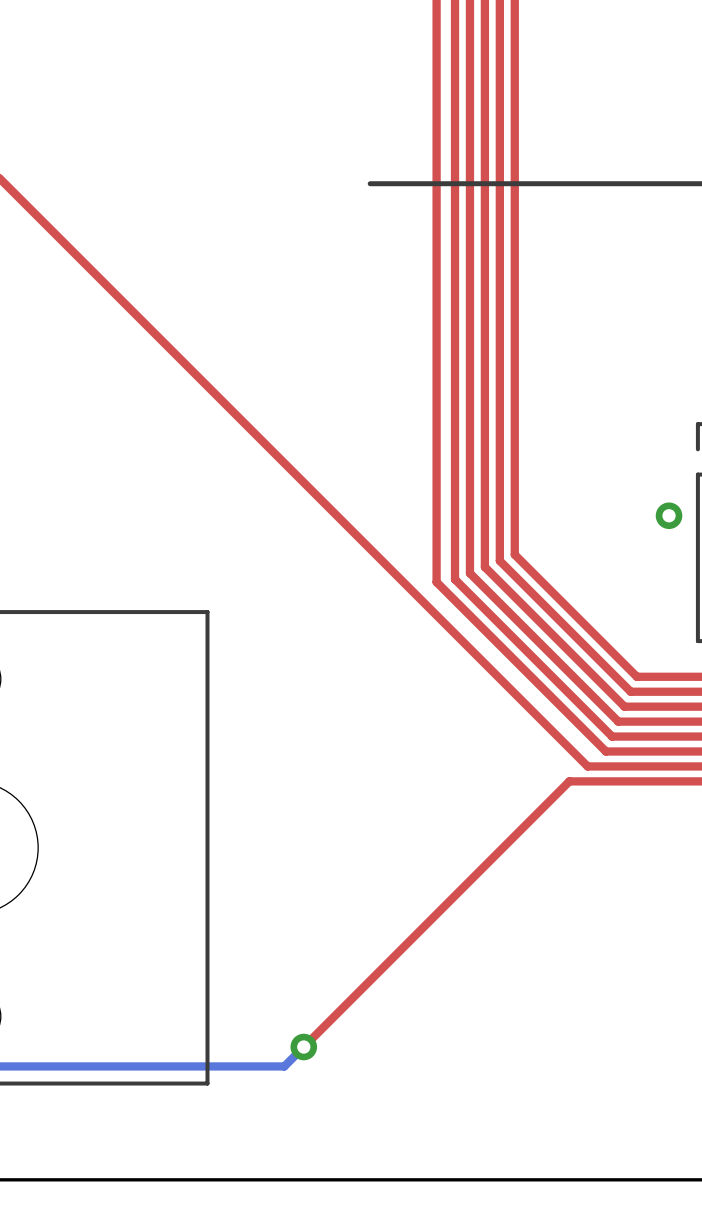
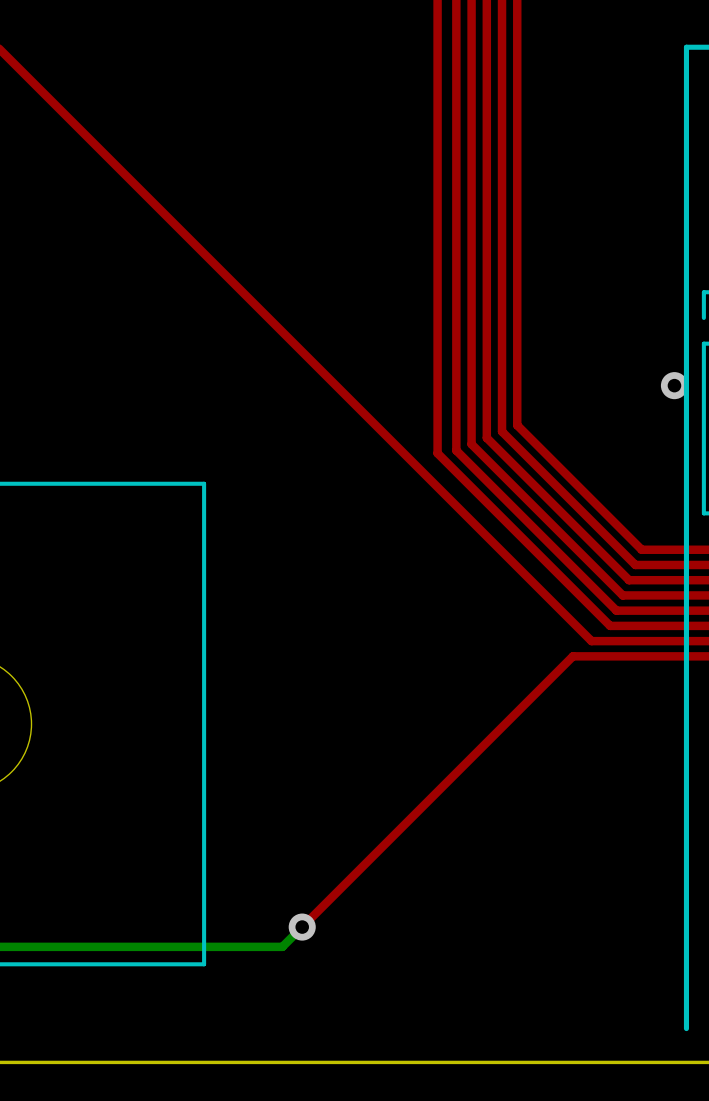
line: (370, 183) (680, 183) -> (686, 1028) (686, 47)

